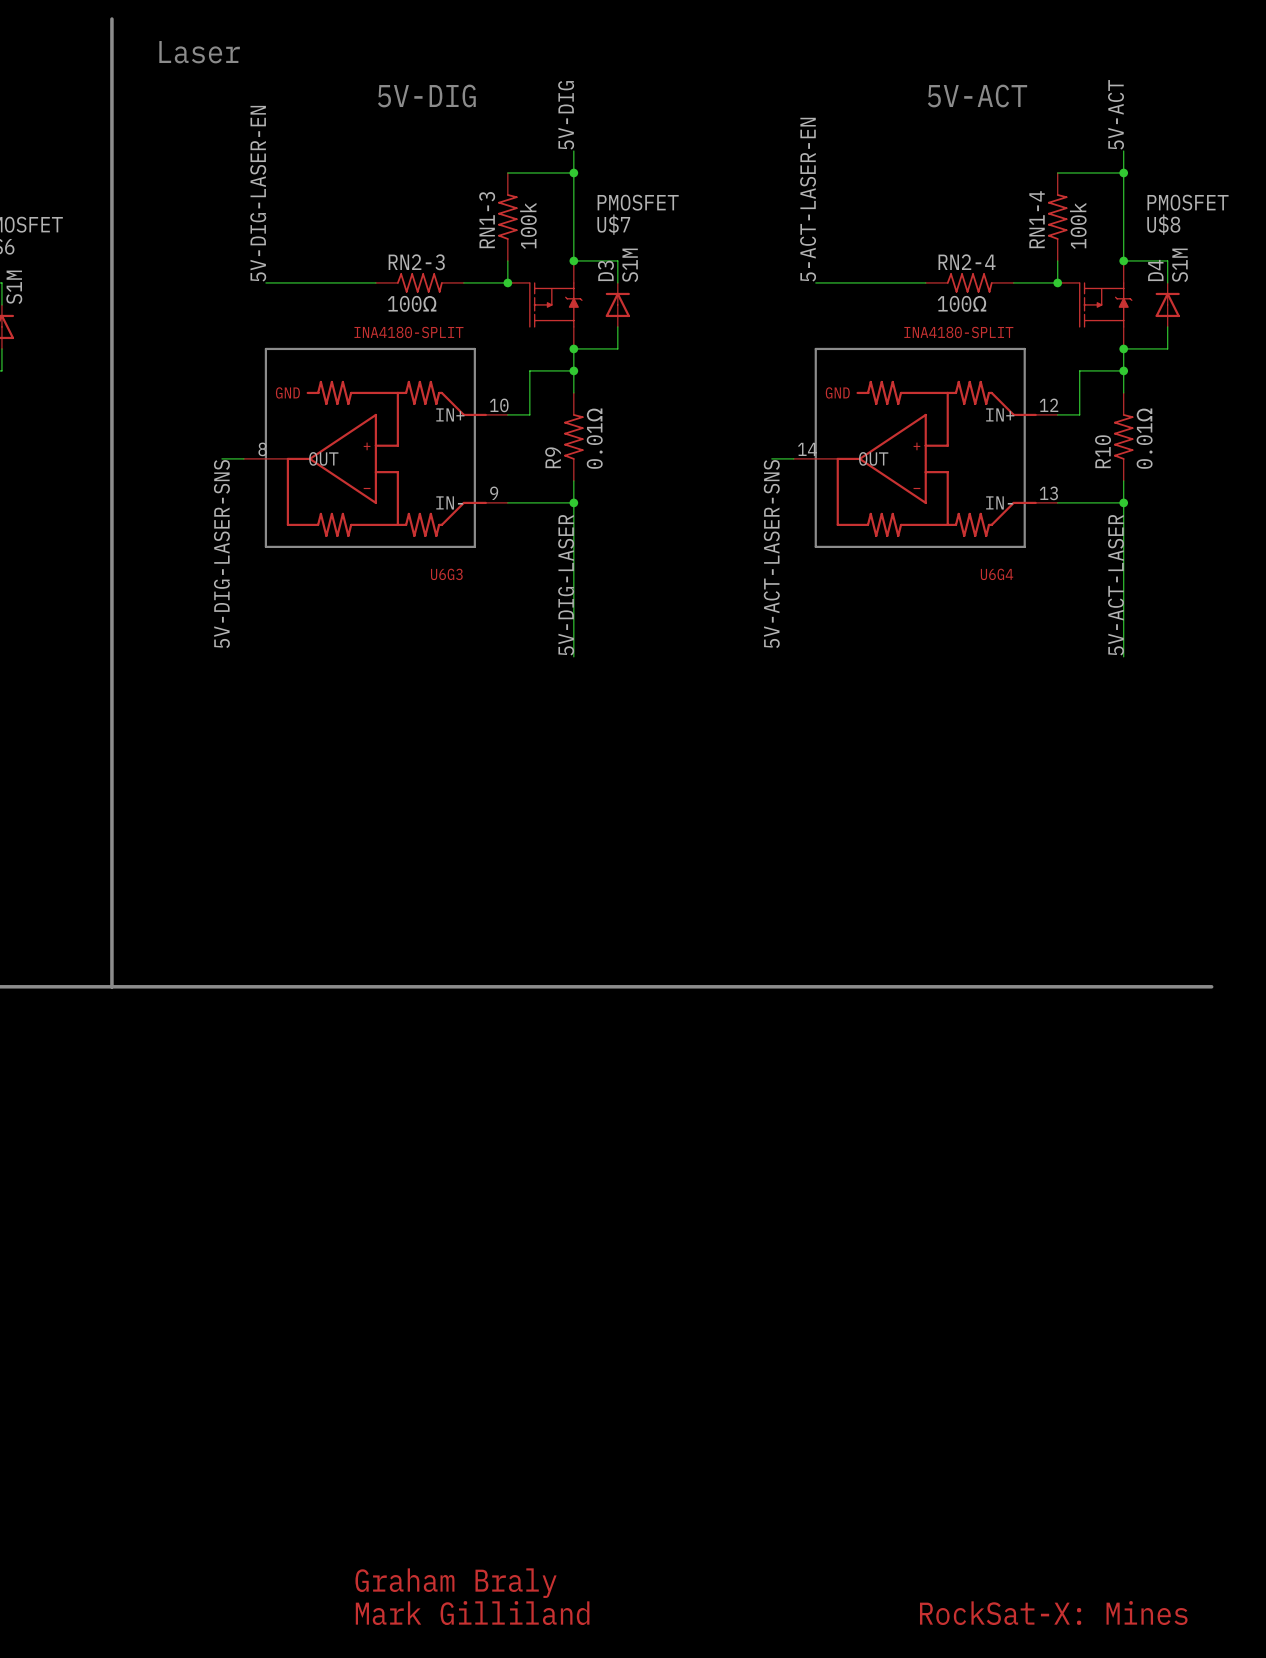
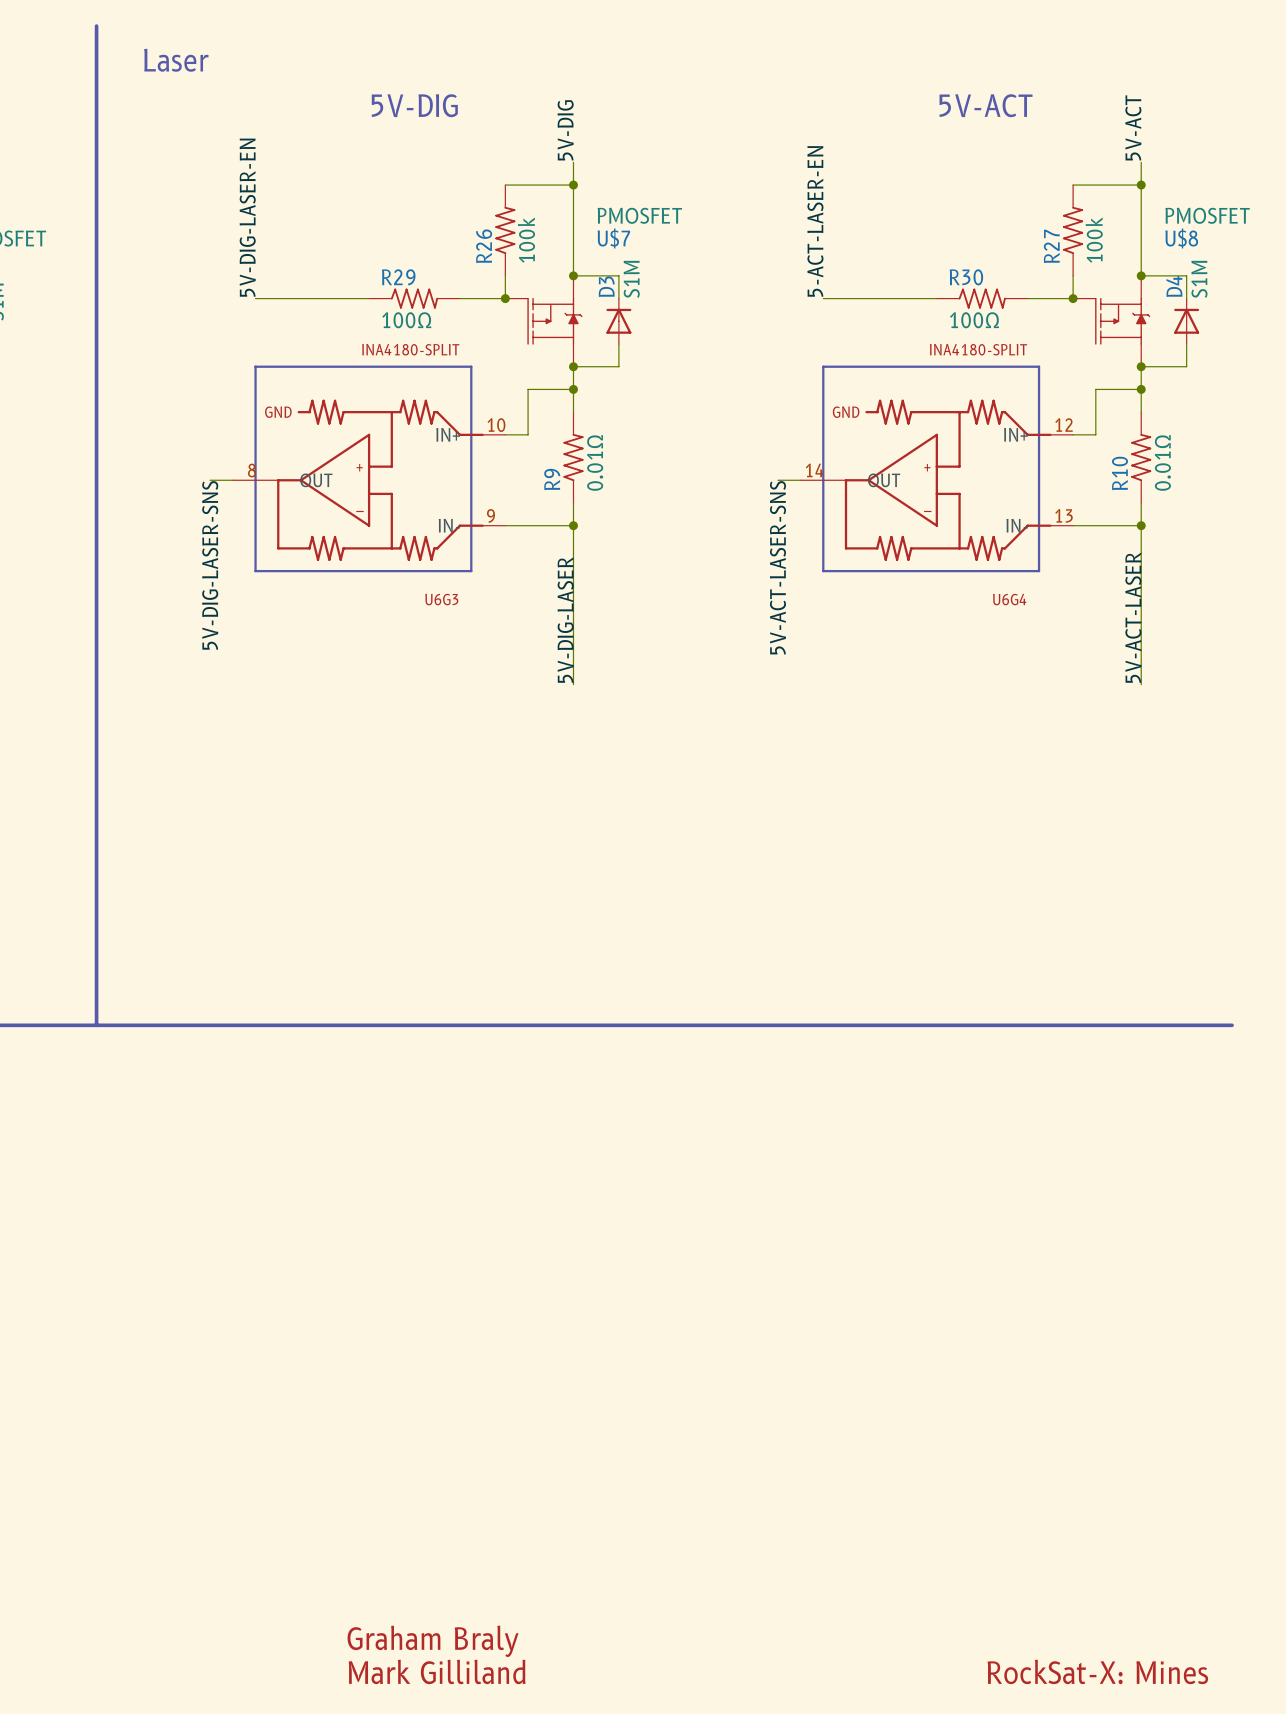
RN1-4 name: RN1-4 (1037, 219) -> R27 (1051, 246)
RN1-3 name: RN1-3 (487, 220) -> R26 (484, 246)
RN2-3 name: RN2-3 (416, 262) -> R29 (398, 277)
RN2-4 name: RN2-4 (967, 262) -> R30 (966, 277)

